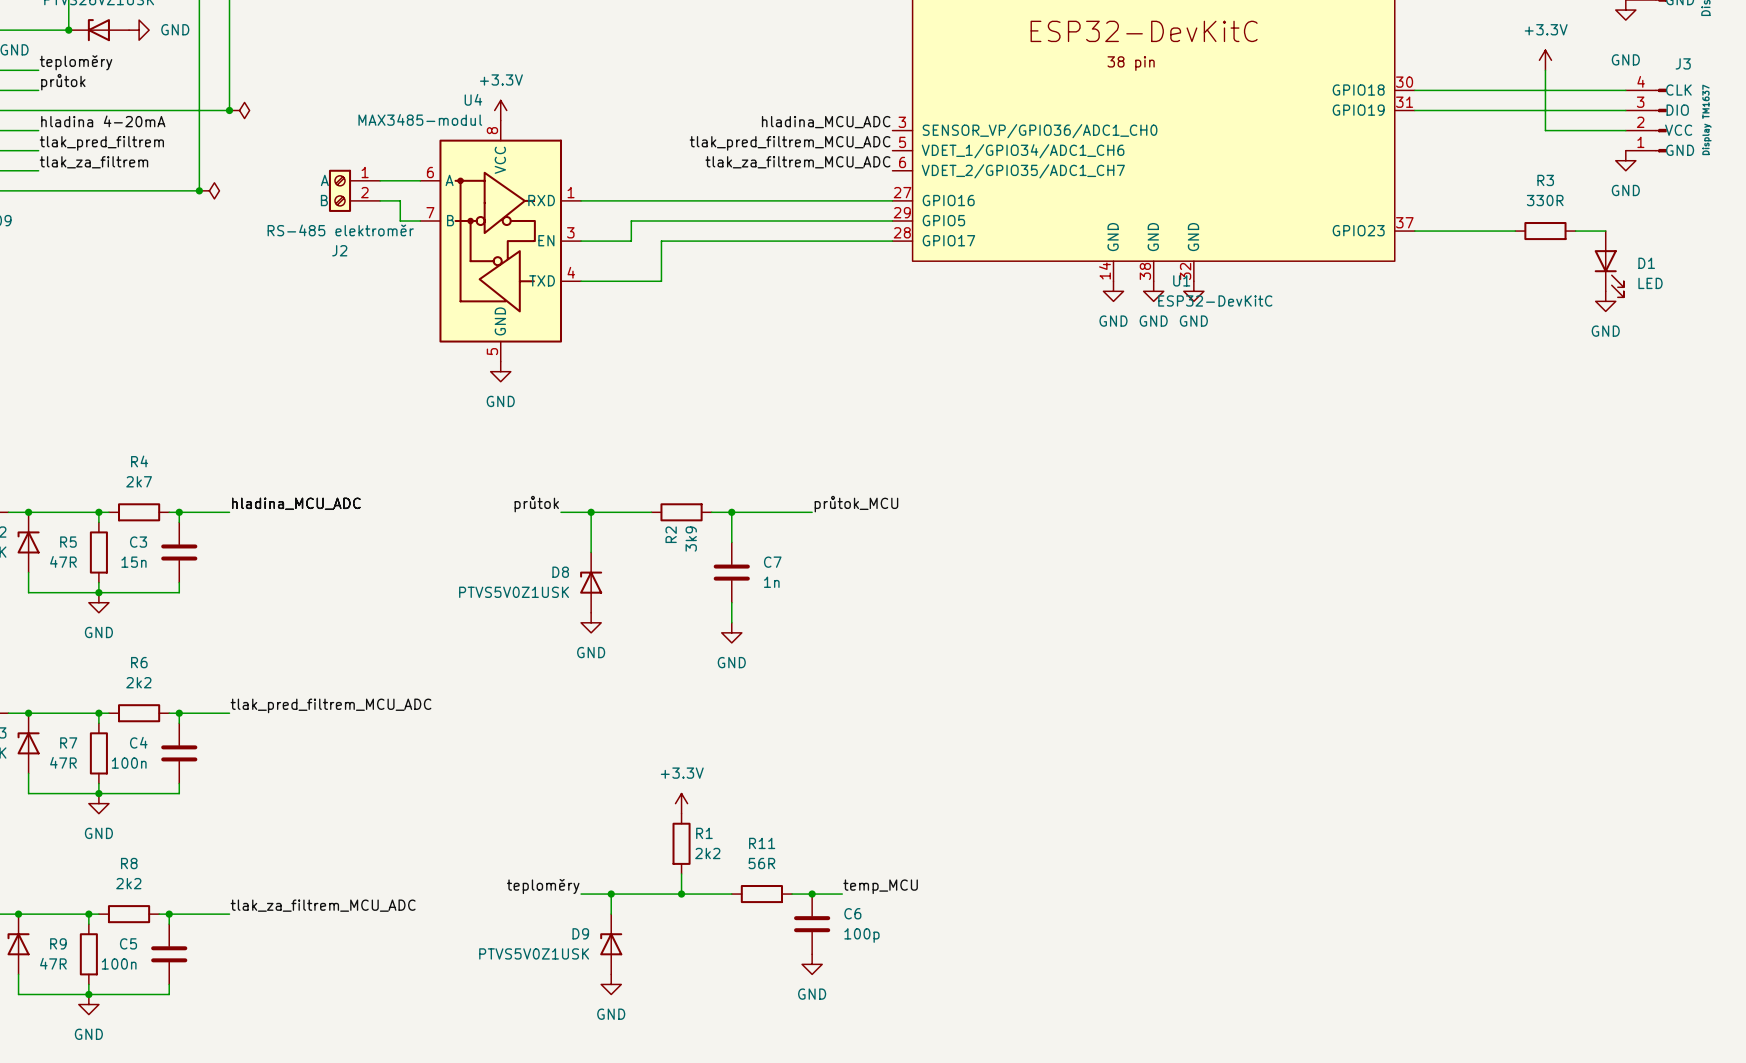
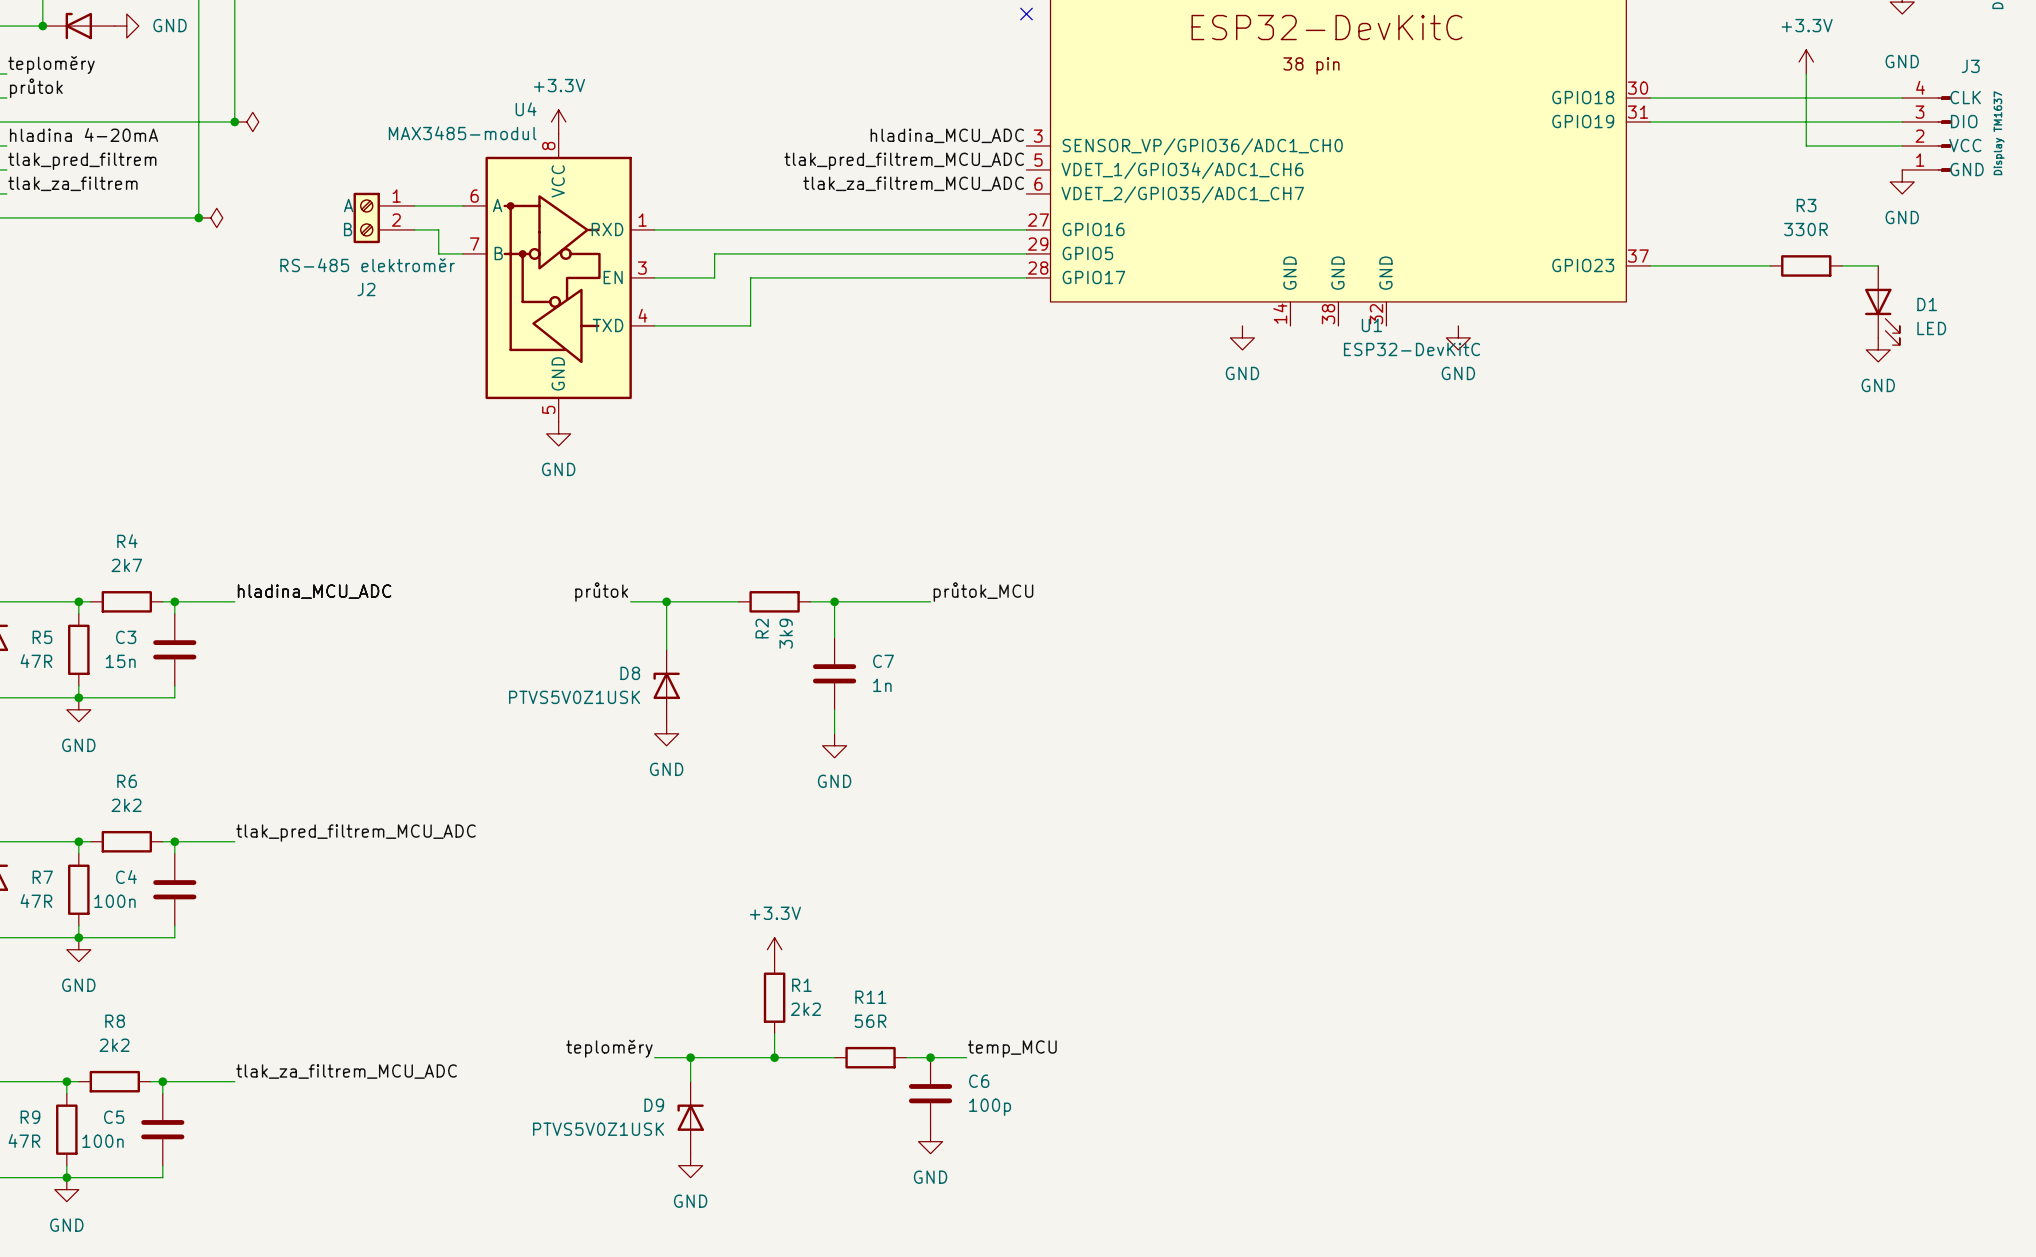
no-connect mark: none -> (1026, 14)
power symbol: none -> GND (1242, 337)
power symbol: GND (1113, 291) -> none
power symbol: GND (1153, 291) -> none
power symbol: GND (1193, 291) -> none
power symbol: none -> GND (1458, 337)

